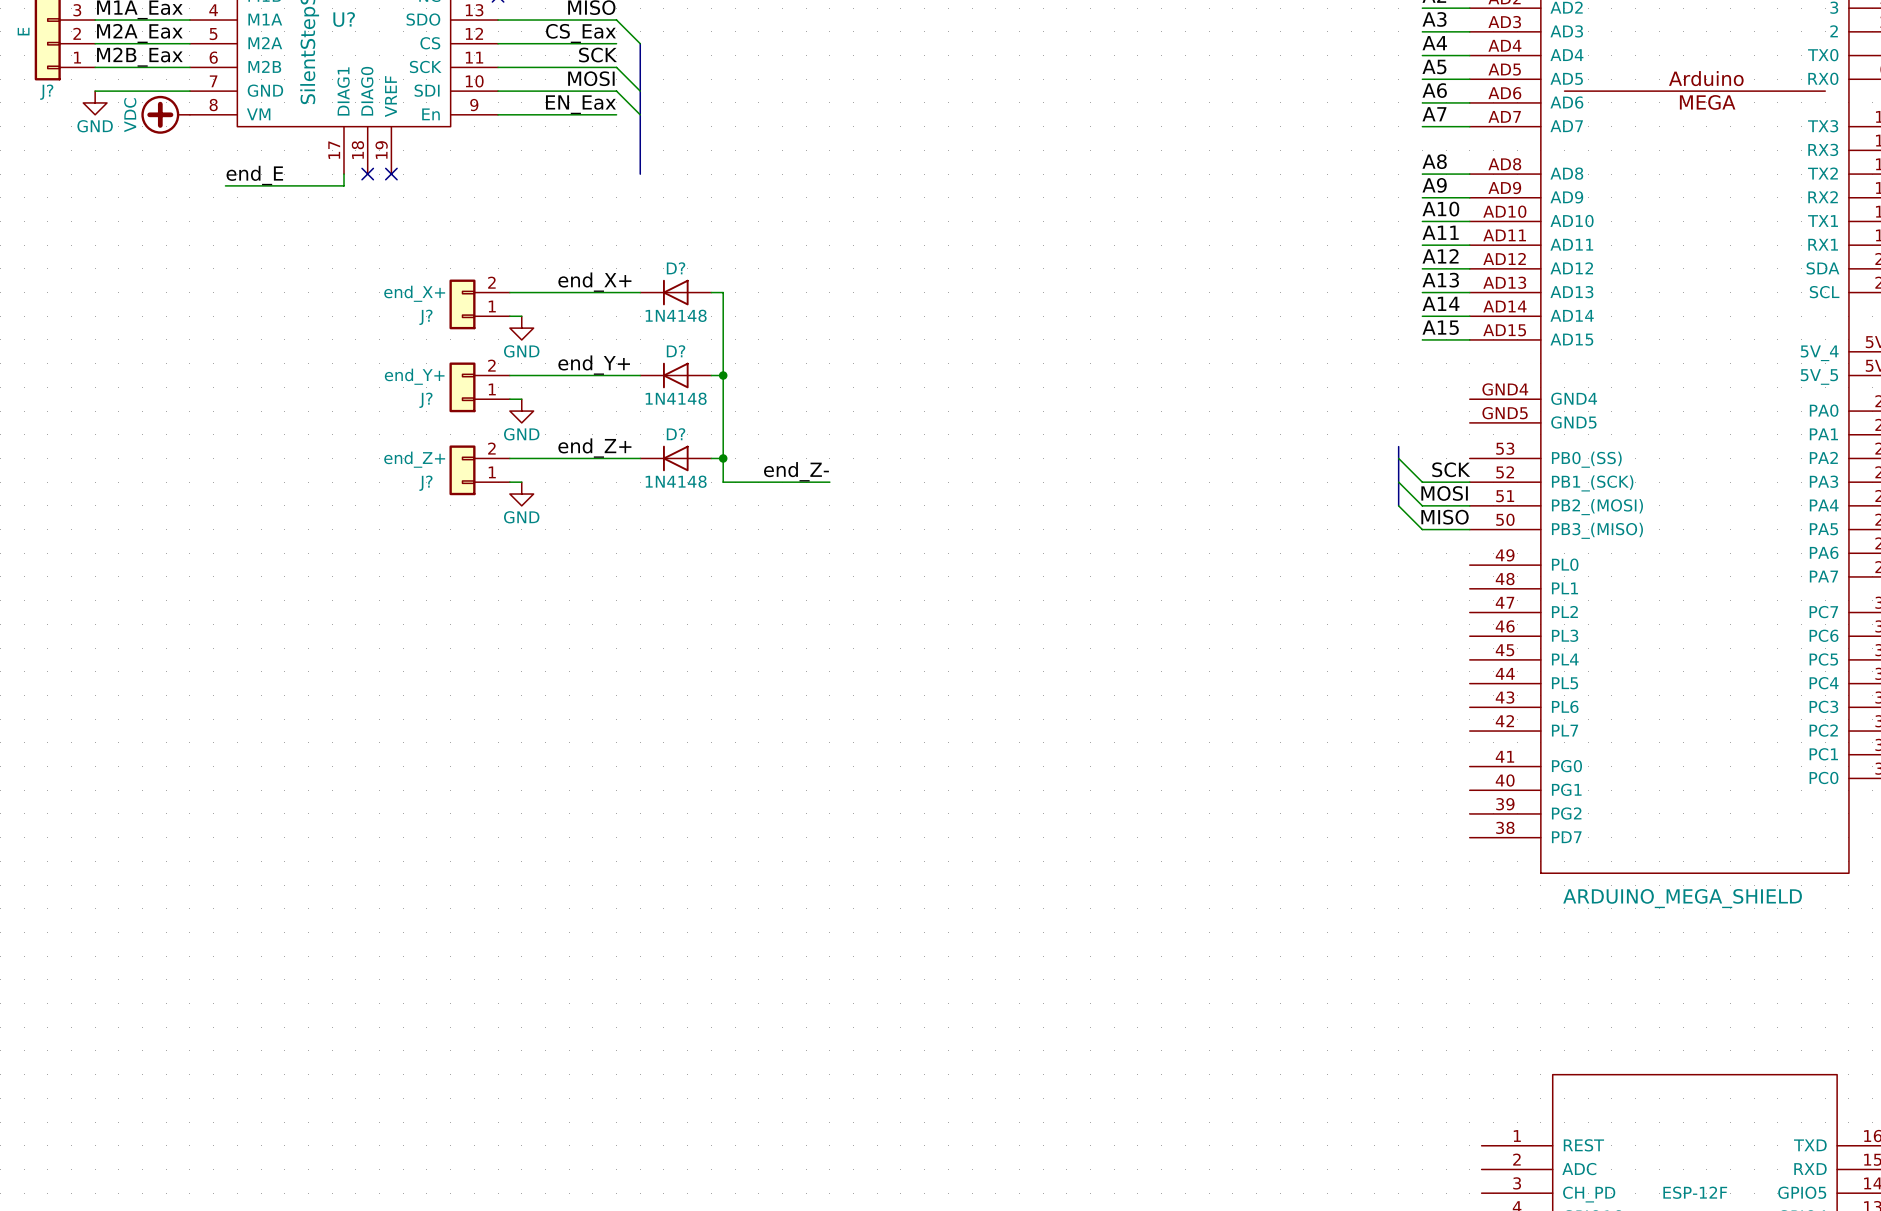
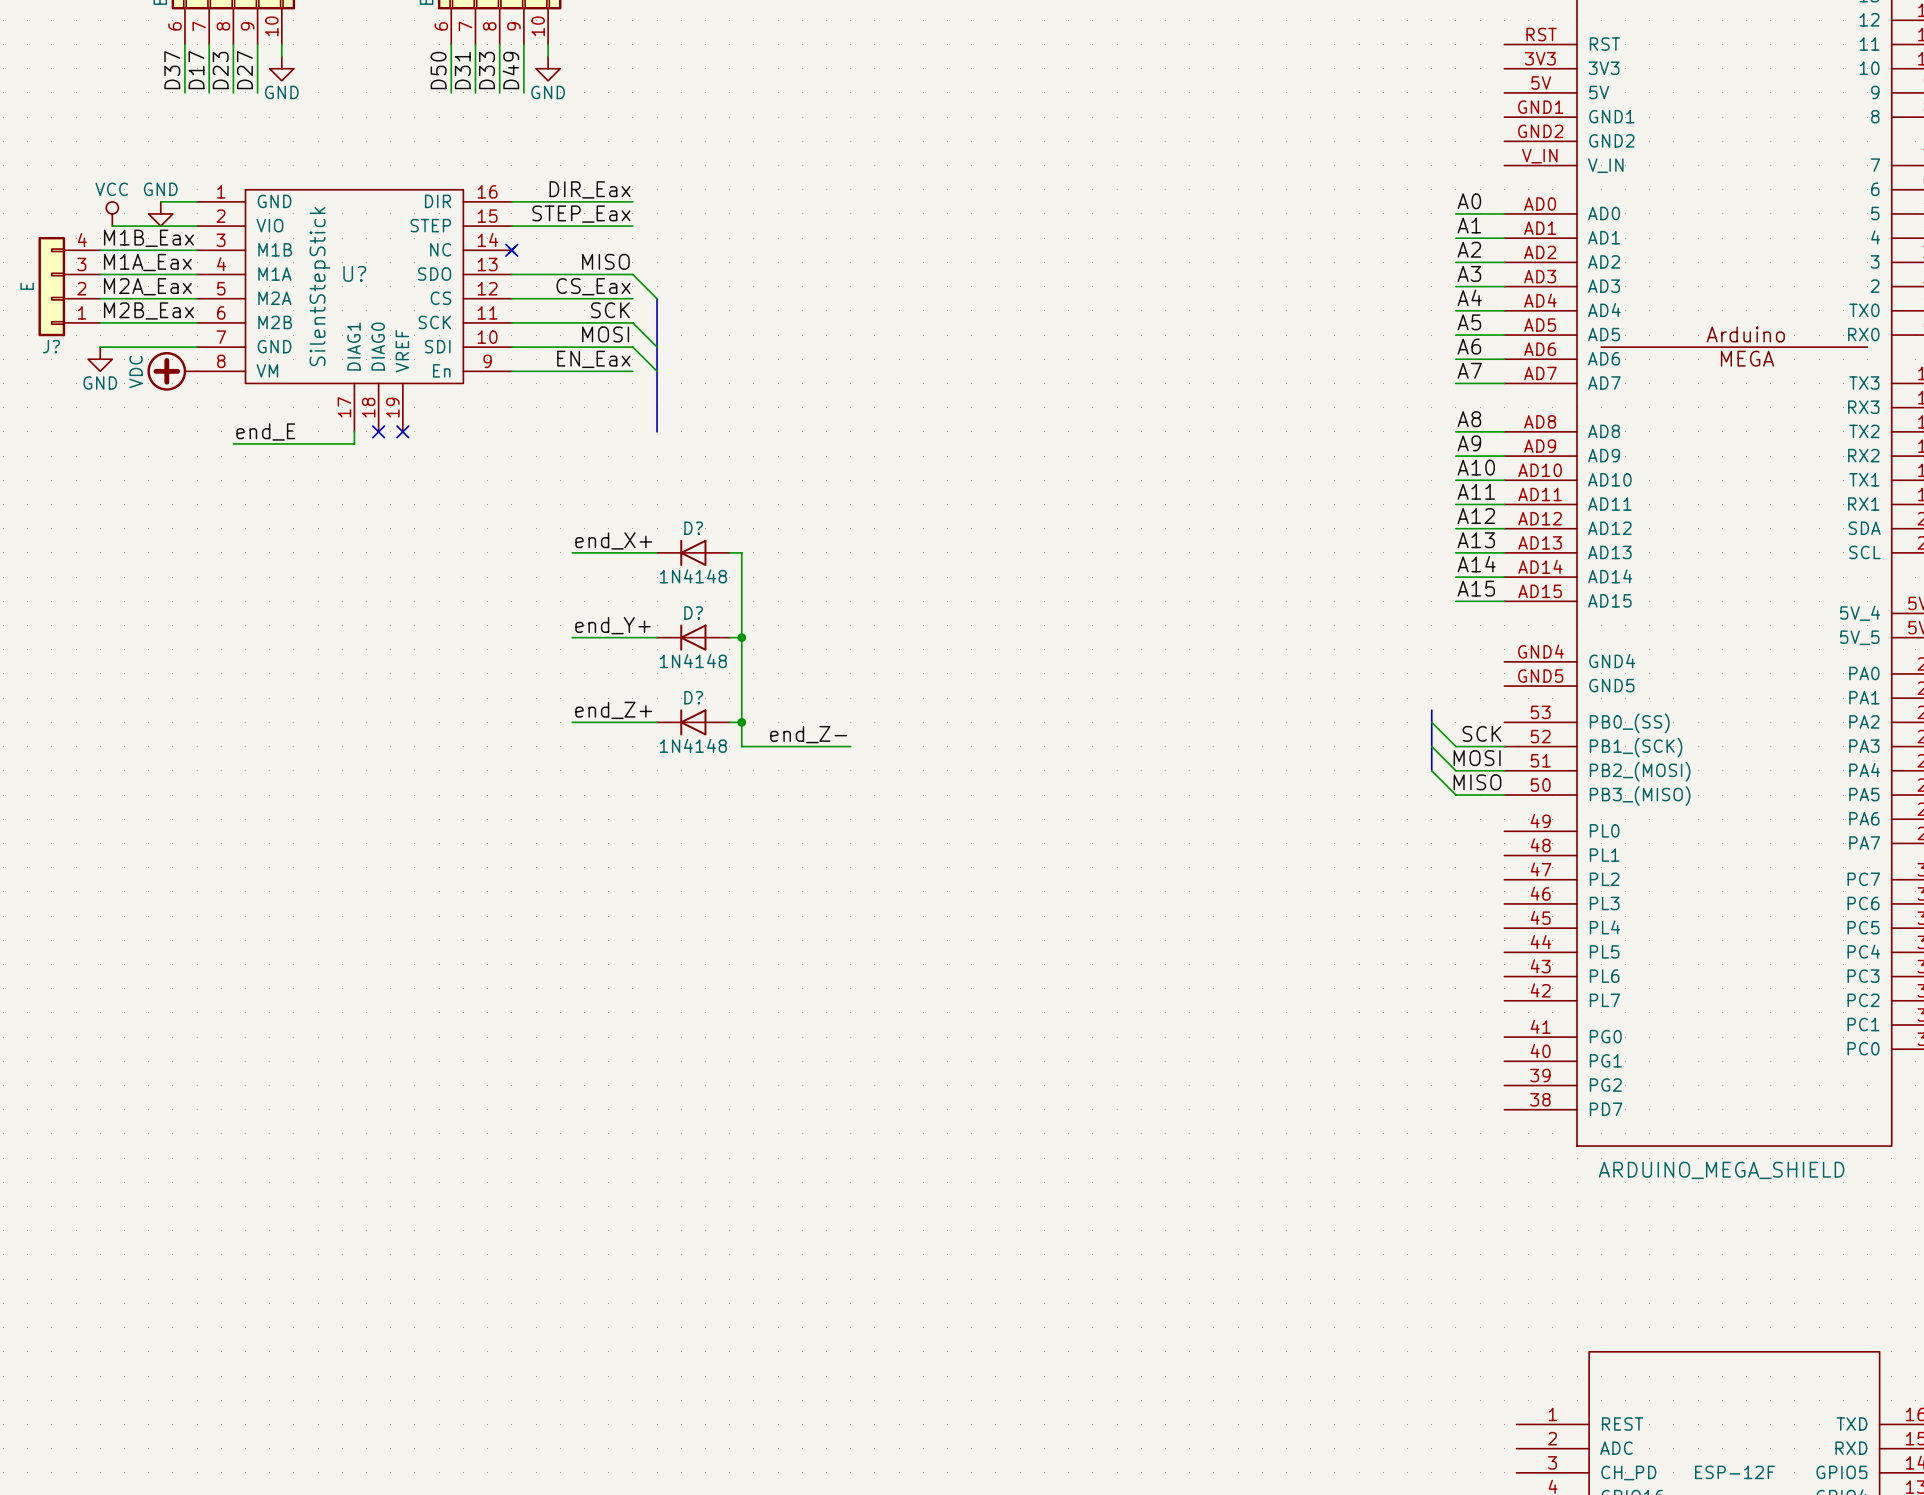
wire: (509, 292) (557, 292) -> none
J?: end_X+ (479, 304) -> none
wire: (509, 316) (521, 316) -> none
power symbol: GND (521, 328) -> none
wire: (509, 375) (557, 375) -> none
J?: end_Y+ (479, 387) -> none
wire: (509, 399) (521, 399) -> none
power symbol: GND (521, 411) -> none
wire: (509, 458) (557, 458) -> none
J?: end_Z+ (479, 470) -> none
wire: (509, 482) (521, 482) -> none
power symbol: GND (521, 494) -> none

